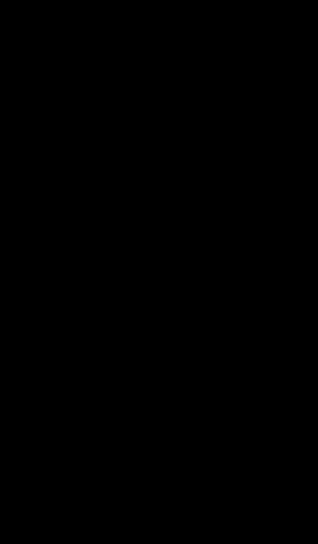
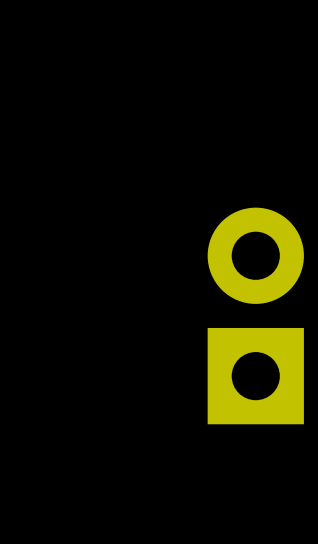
part: none -> (255, 315)

